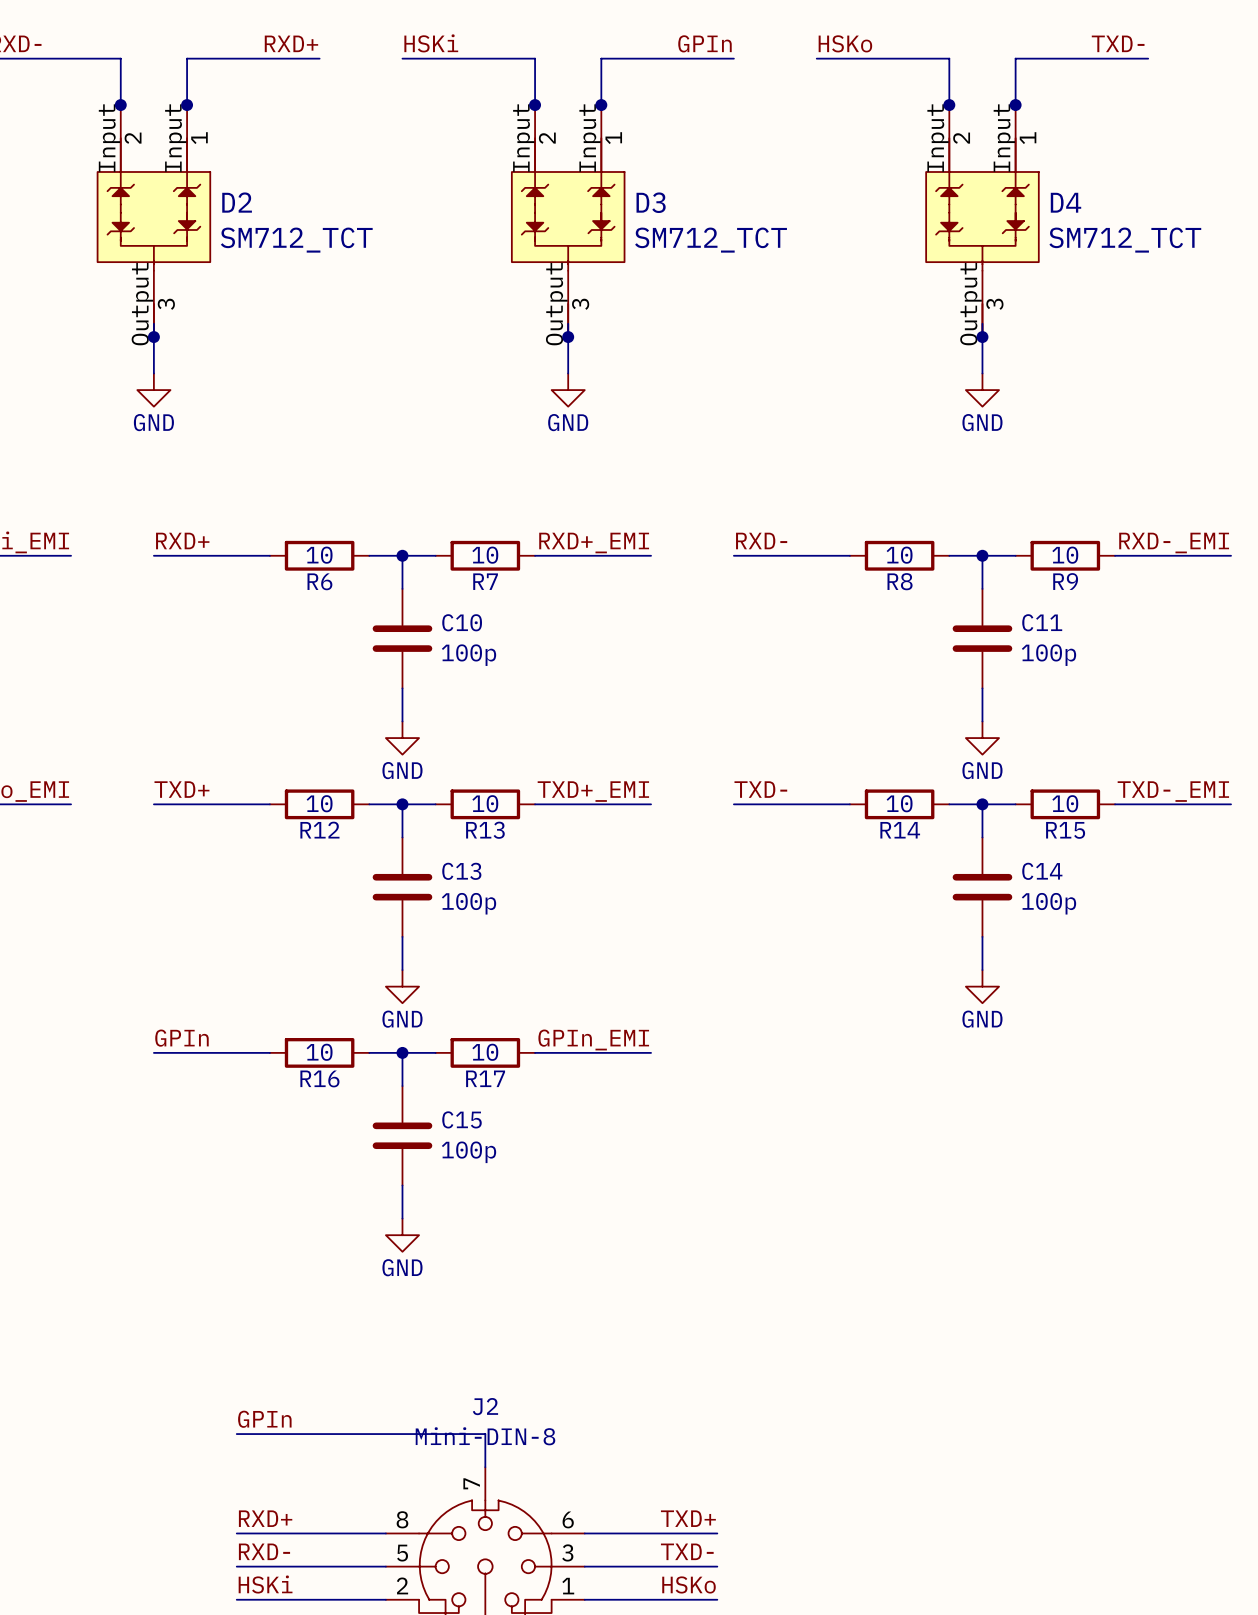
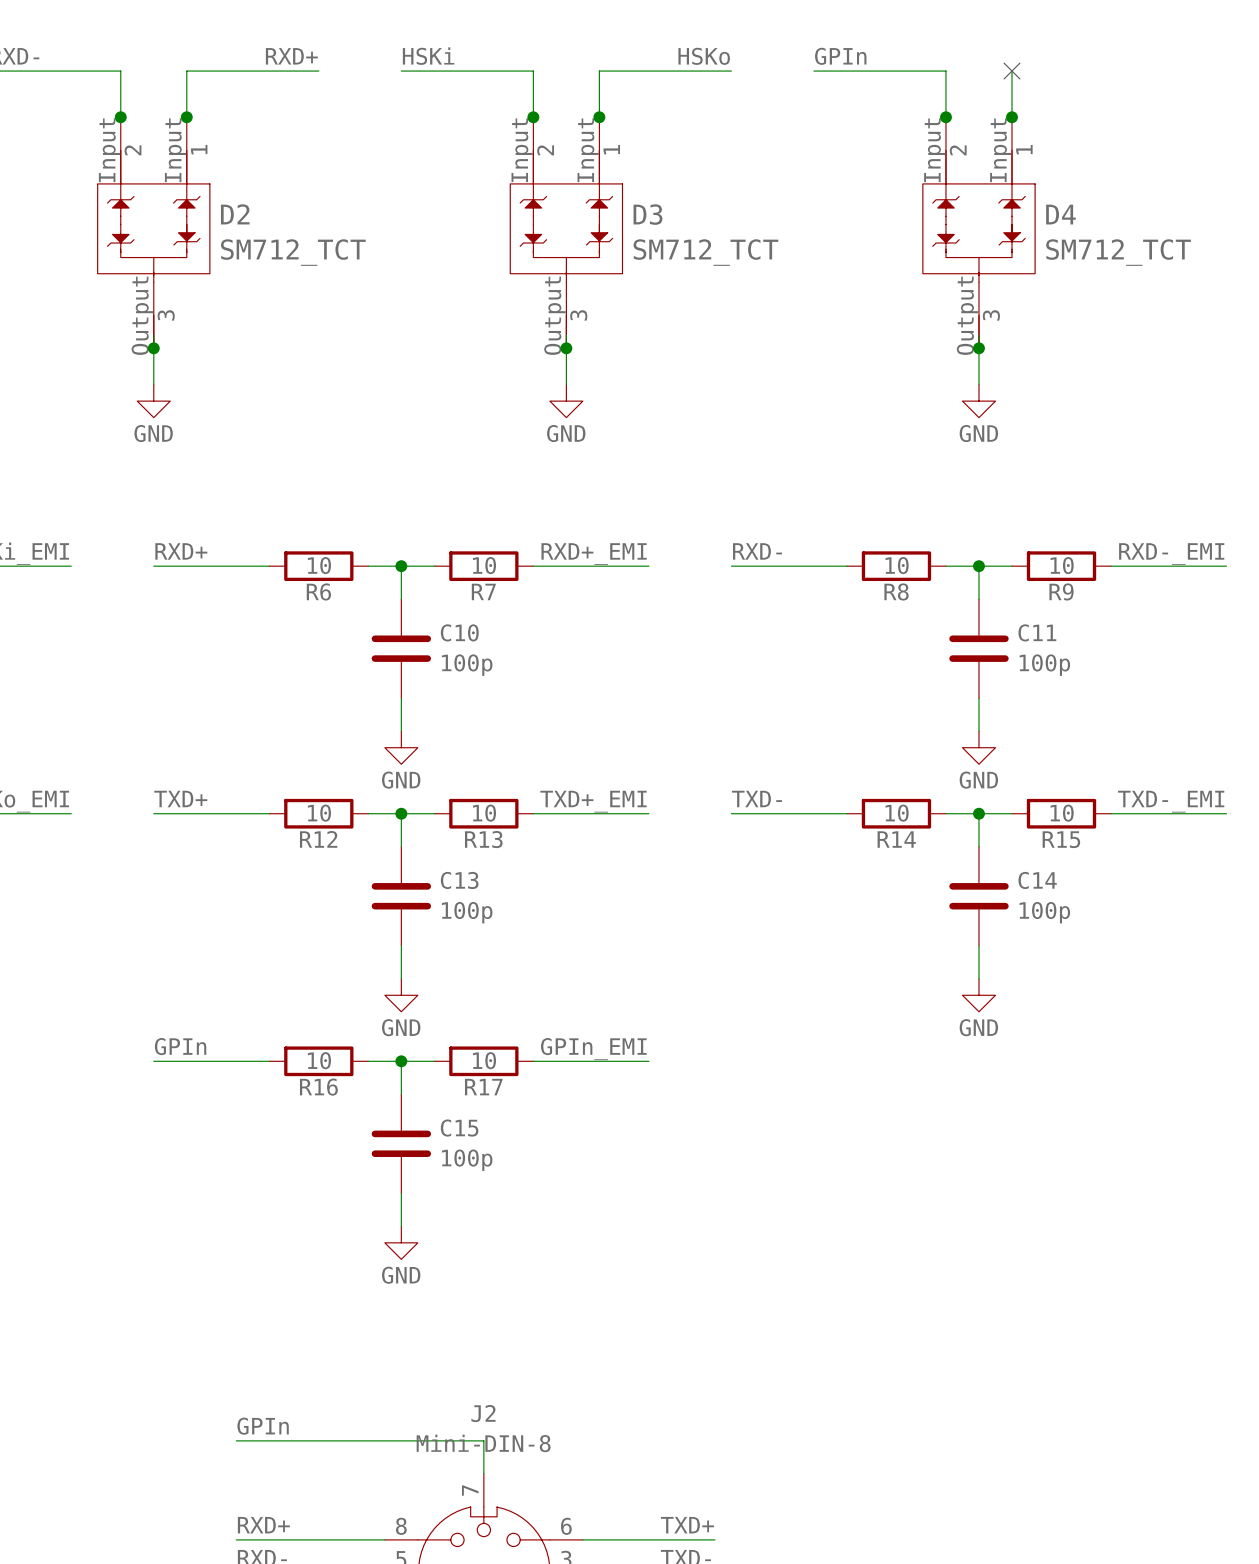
label: GPIn (704, 43) -> HSKo (704, 56)
label: HSKo (845, 43) -> GPIn (840, 56)
label: TXD- (1118, 43) -> none
wire: (1015, 58) (1148, 58) -> none
no-connect mark: none -> (1011, 71)

